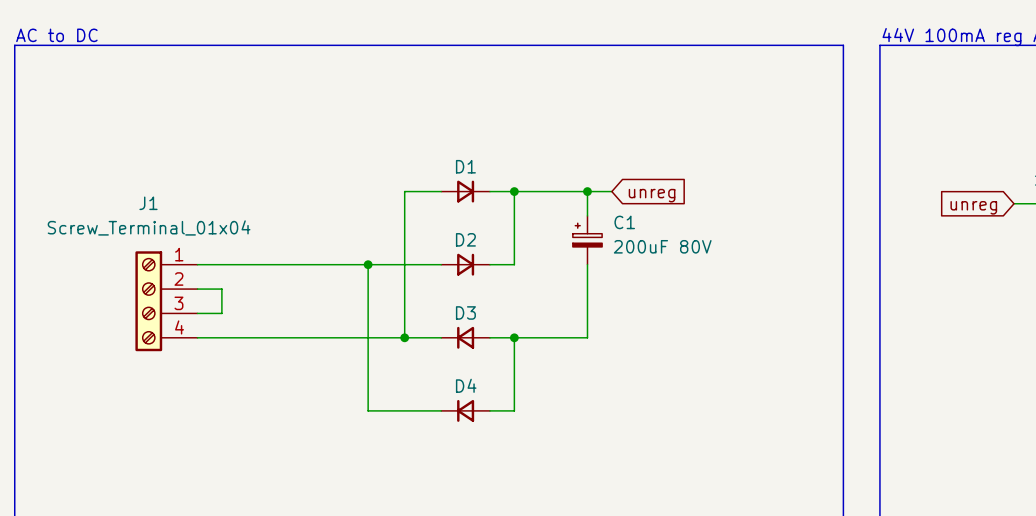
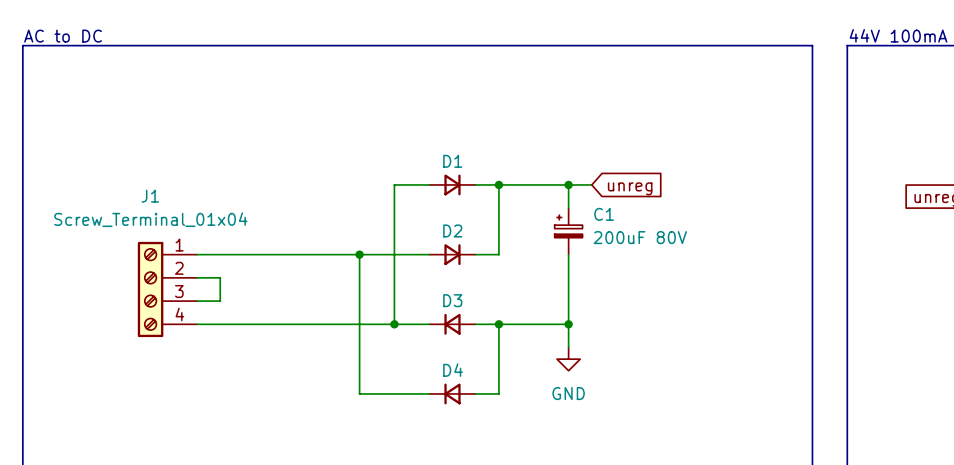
wire: none -> (568, 324) (568, 347)
junction: none -> (568, 324)
power symbol: none -> GND (568, 359)

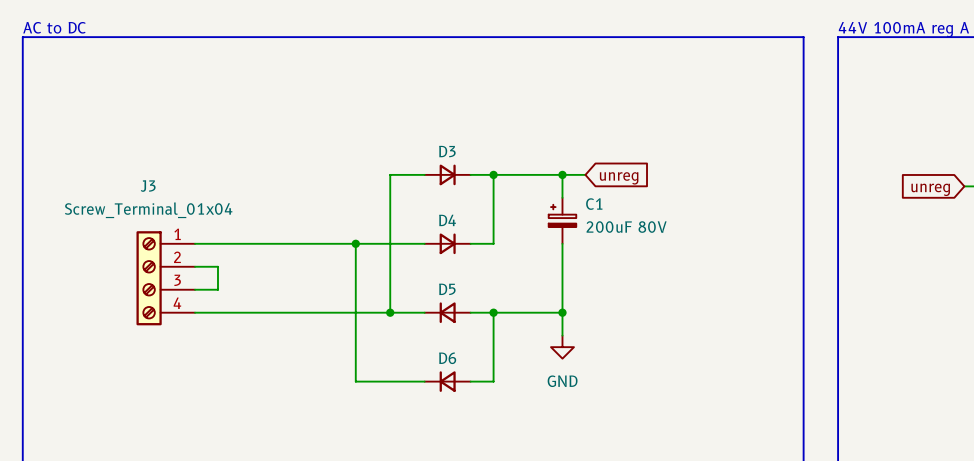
D1 name: D1 (452, 161) -> D3 (447, 151)
J1 name: J1 (150, 196) -> J3 (148, 186)
D2 name: D2 (452, 230) -> D4 (447, 220)
D3 name: D3 (452, 300) -> D5 (447, 289)
D4 name: D4 (453, 370) -> D6 (447, 358)

